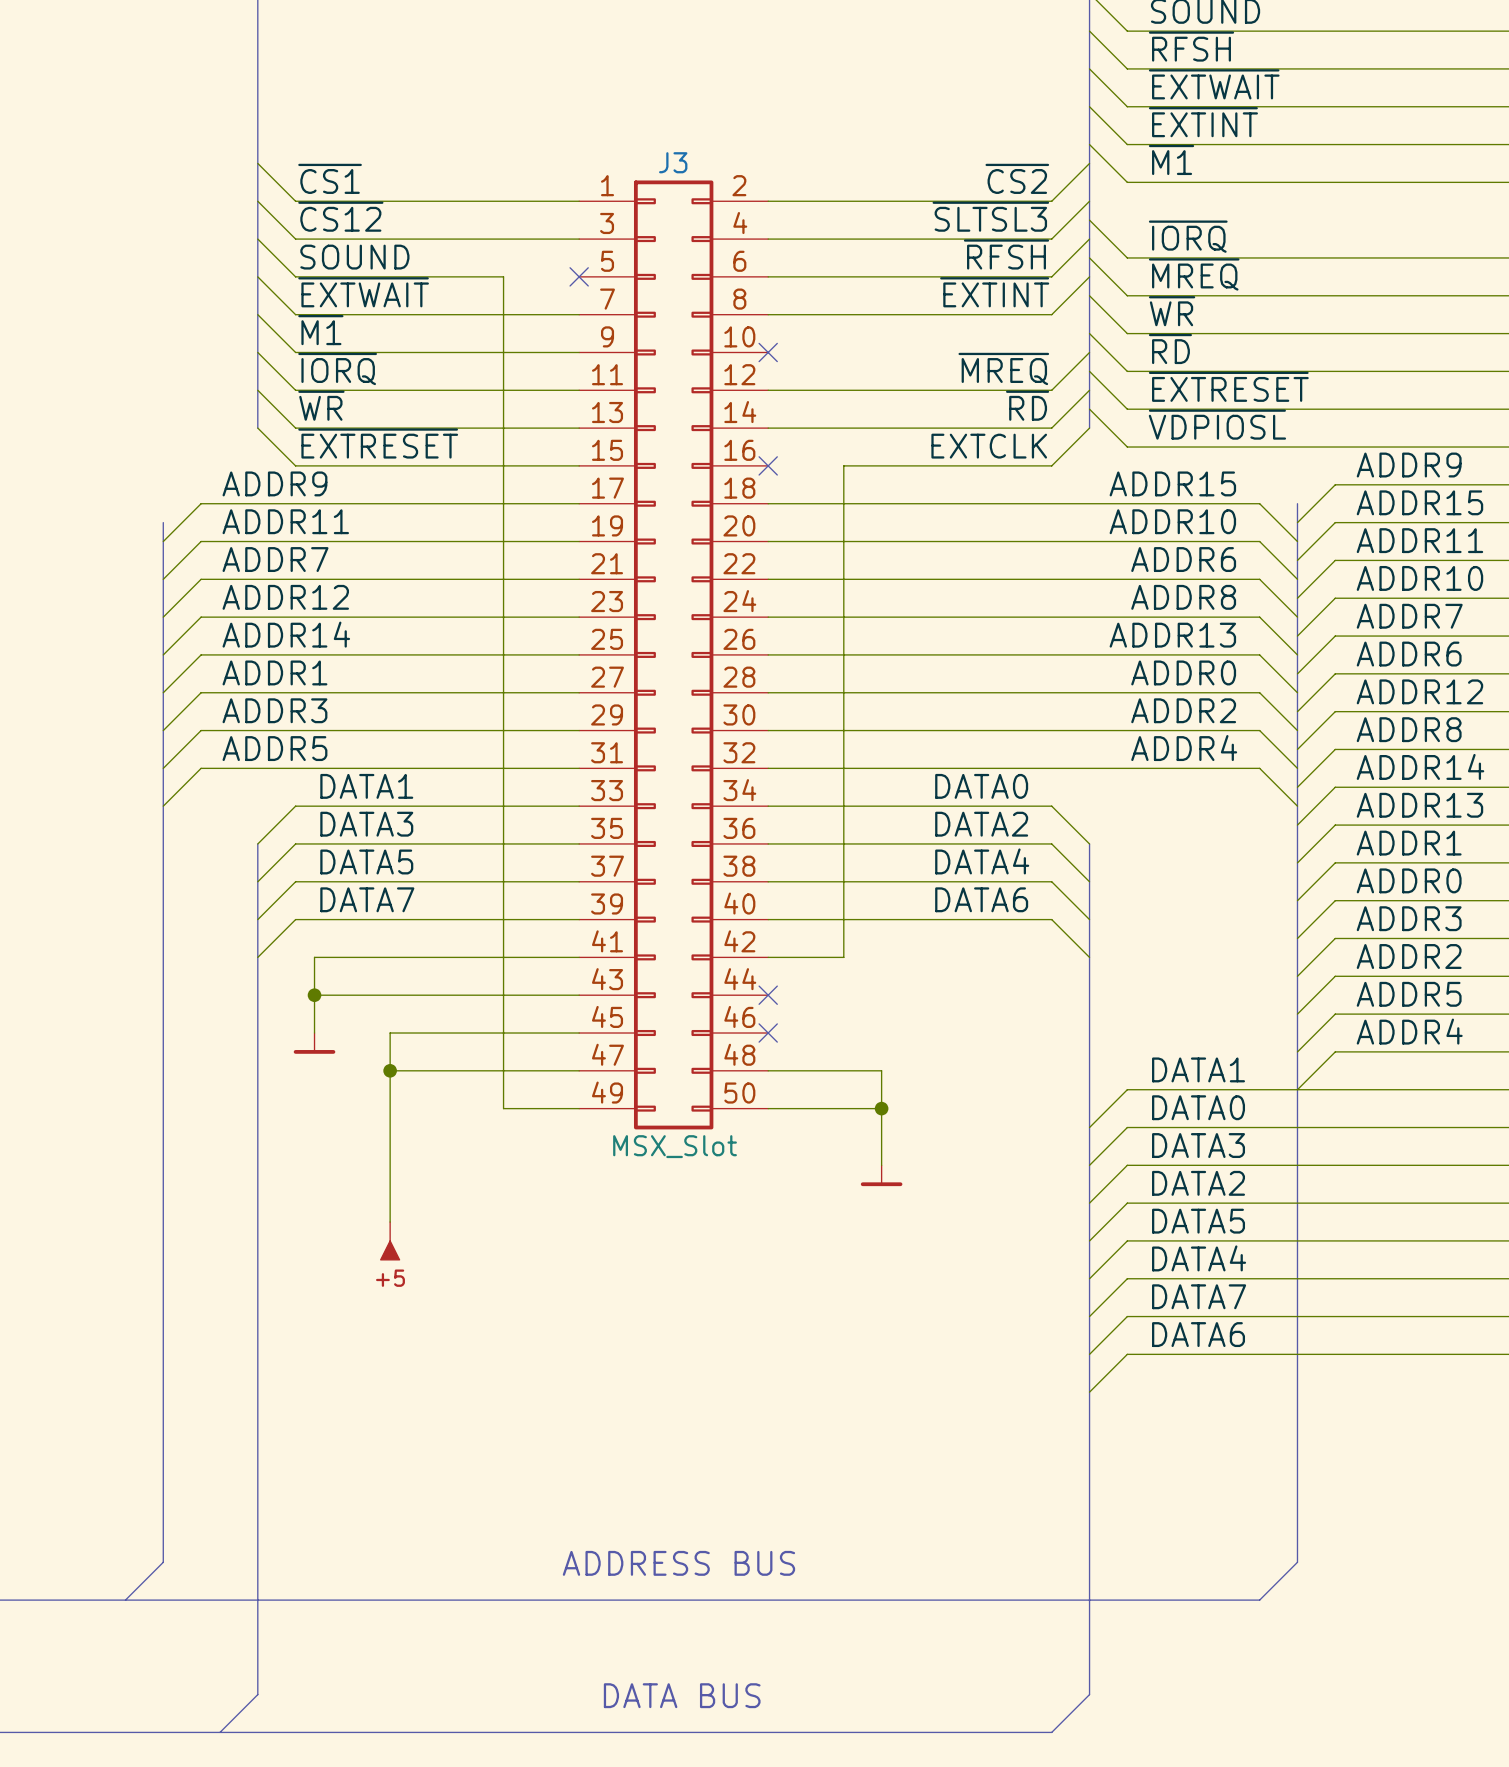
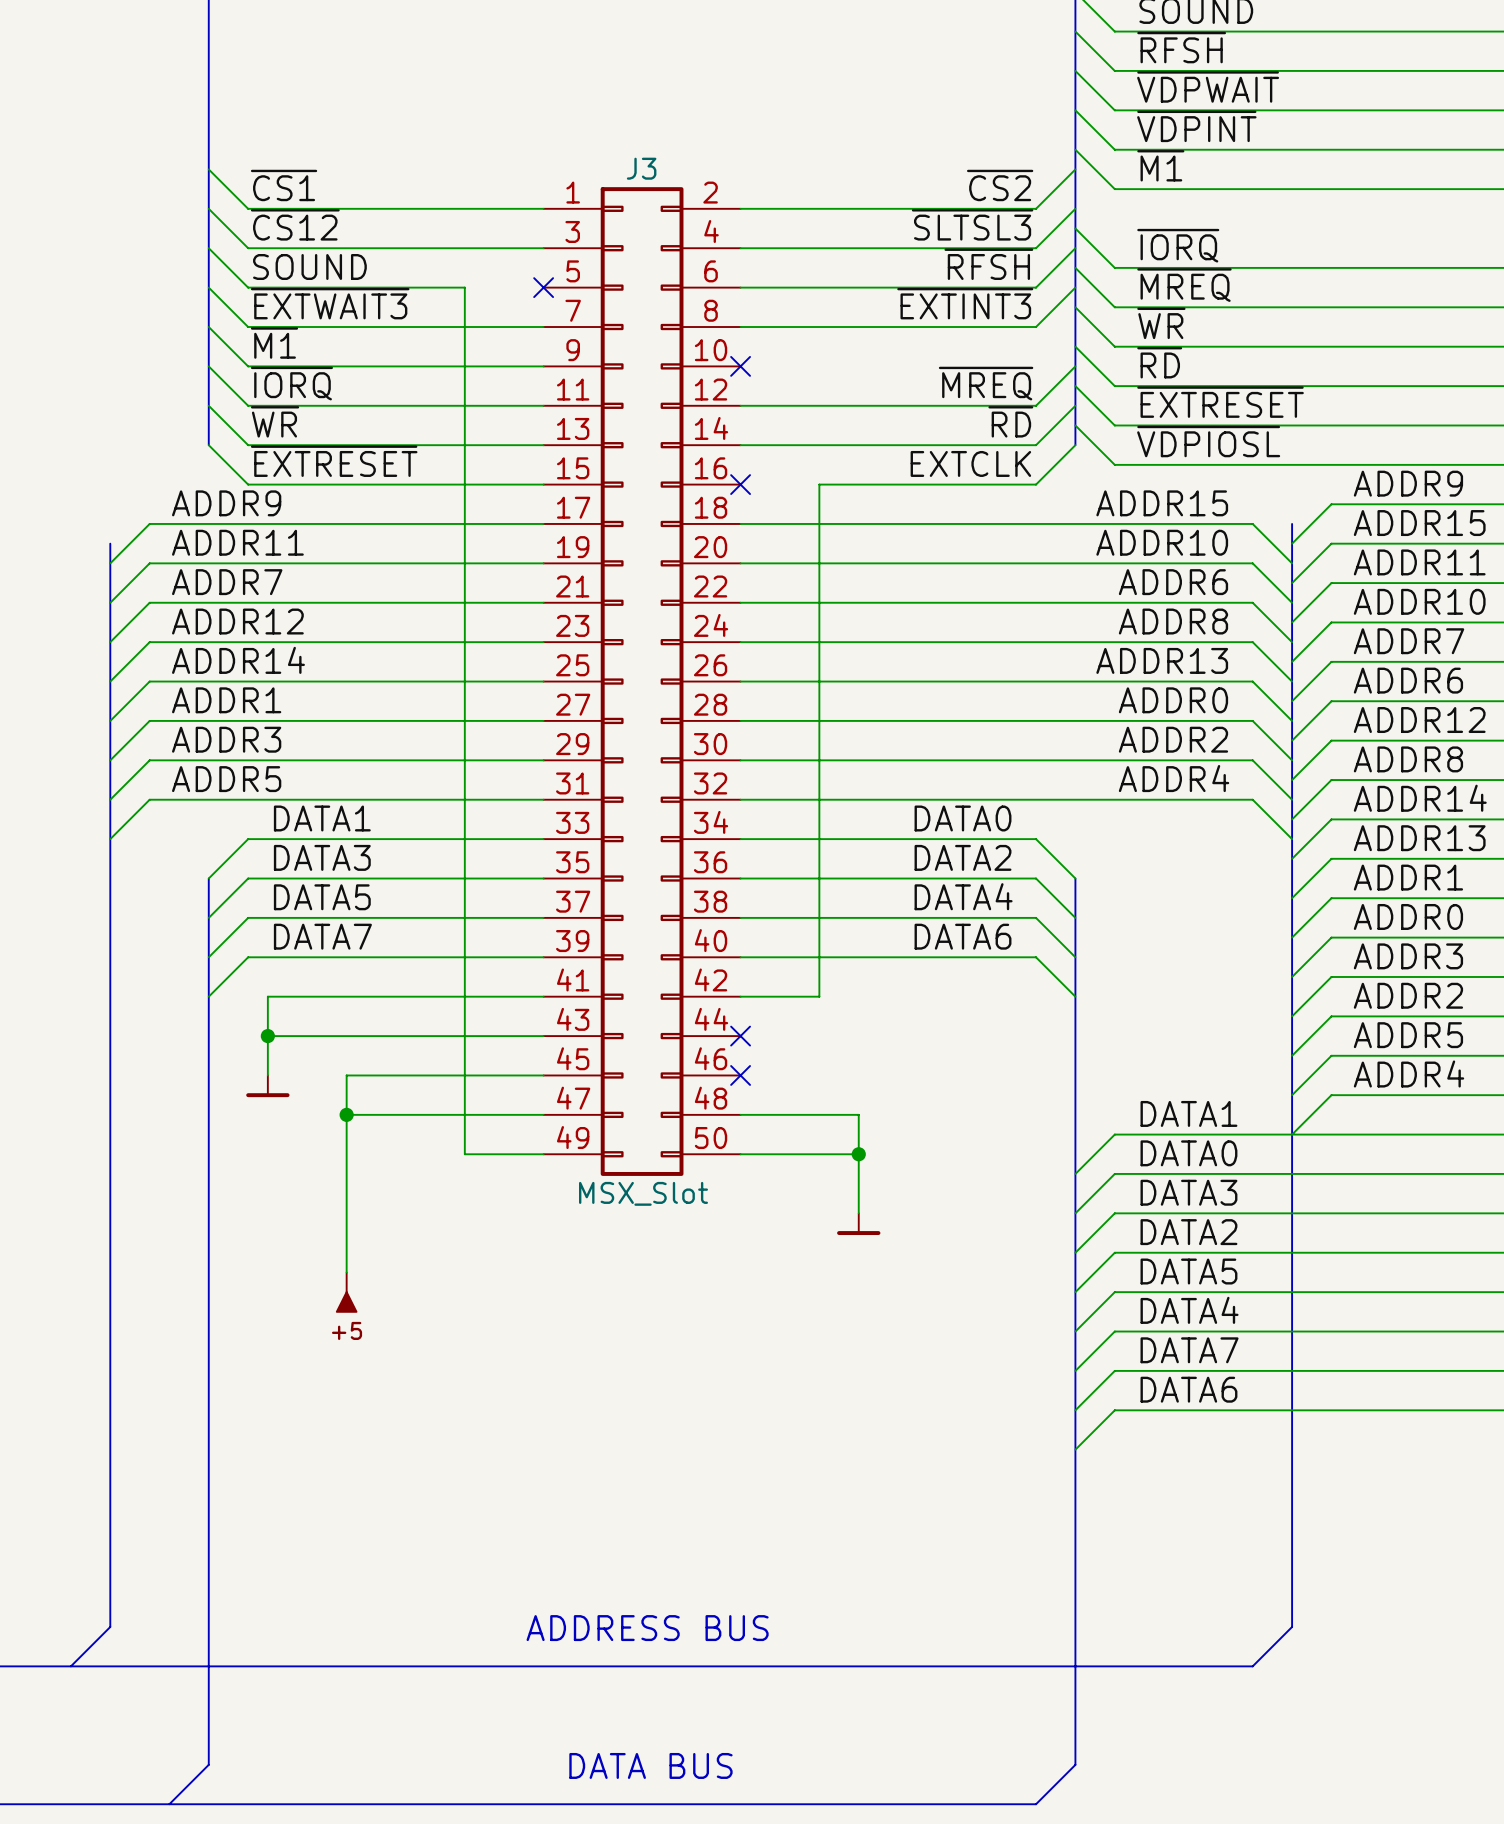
label: ~{EXTWAIT} (1214, 84) -> ~{VDPWAIT} (1208, 87)
label: ~{EXTINT} (1203, 122) -> ~{VDPINT} (1196, 126)
label: ~{EXTWAIT} (363, 292) -> ~{EXTWAIT3} (330, 303)
label: ~{EXTINT} (994, 292) -> ~{EXTINT3} (965, 303)

